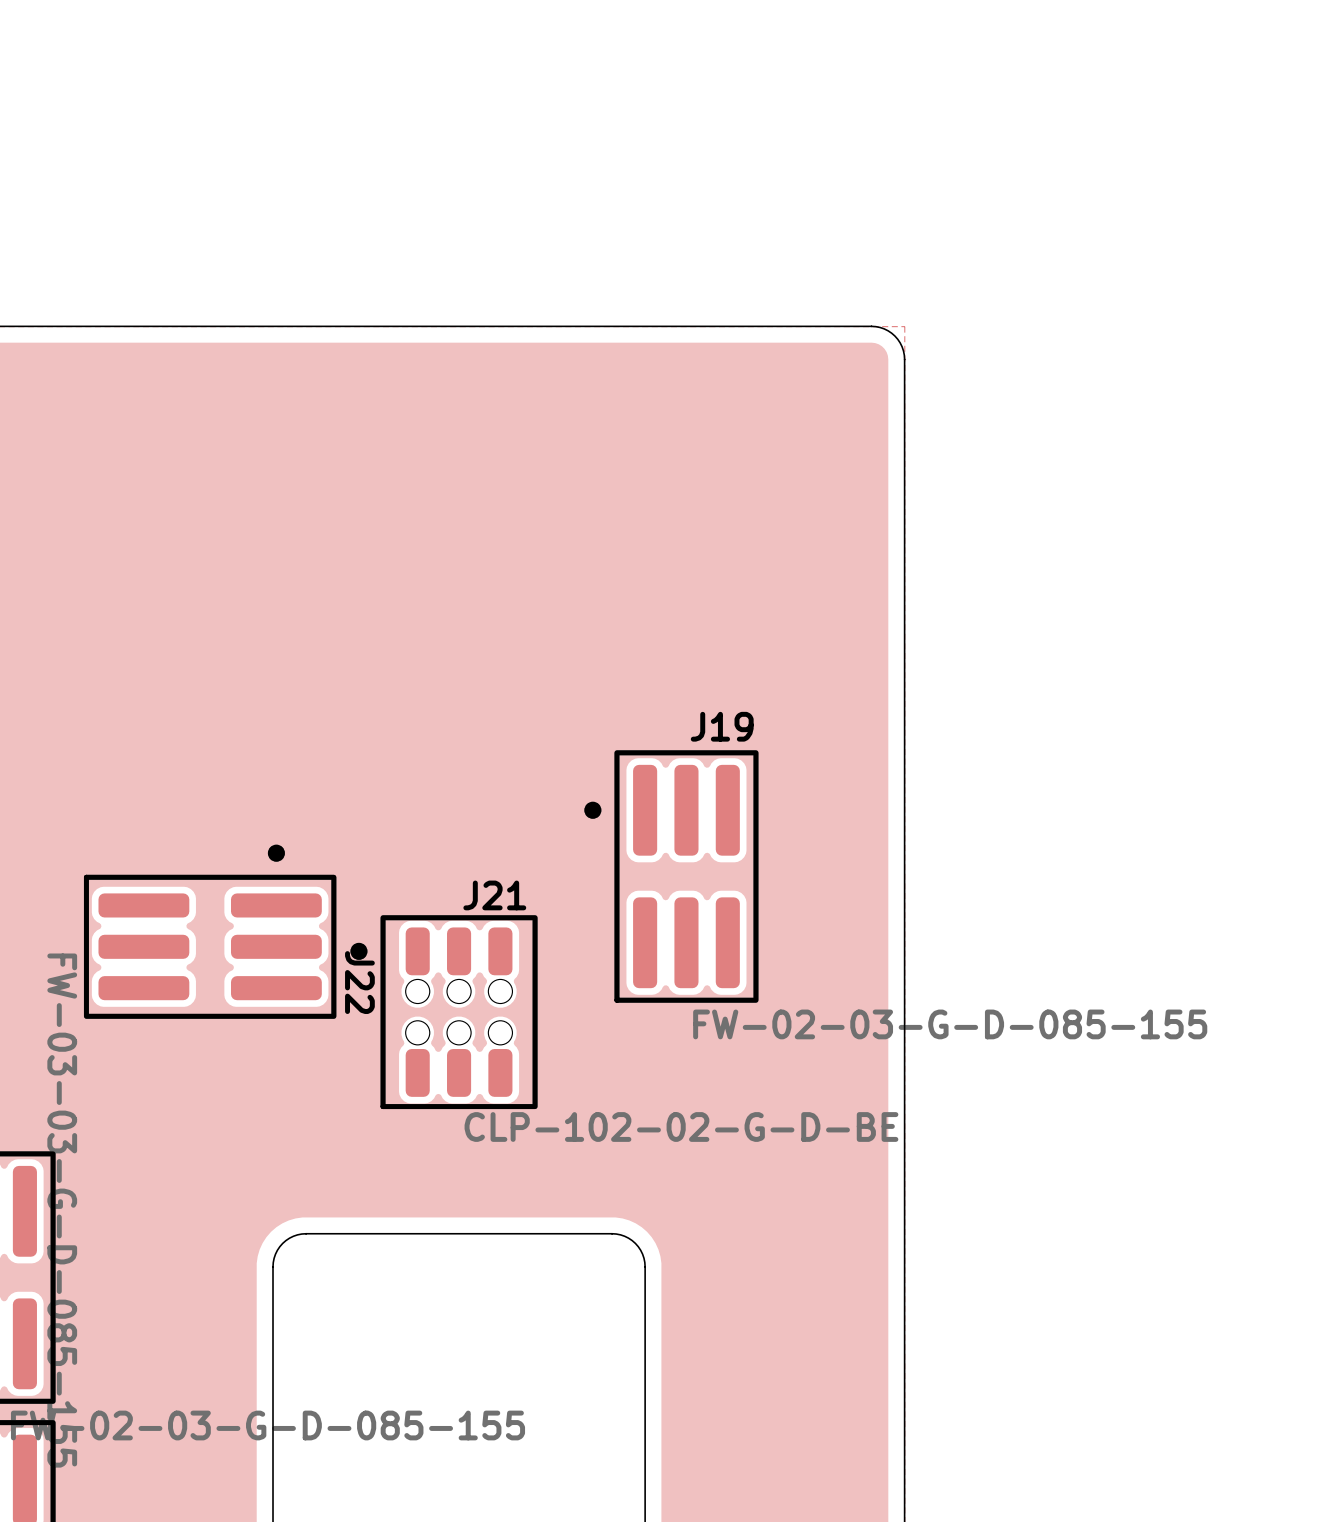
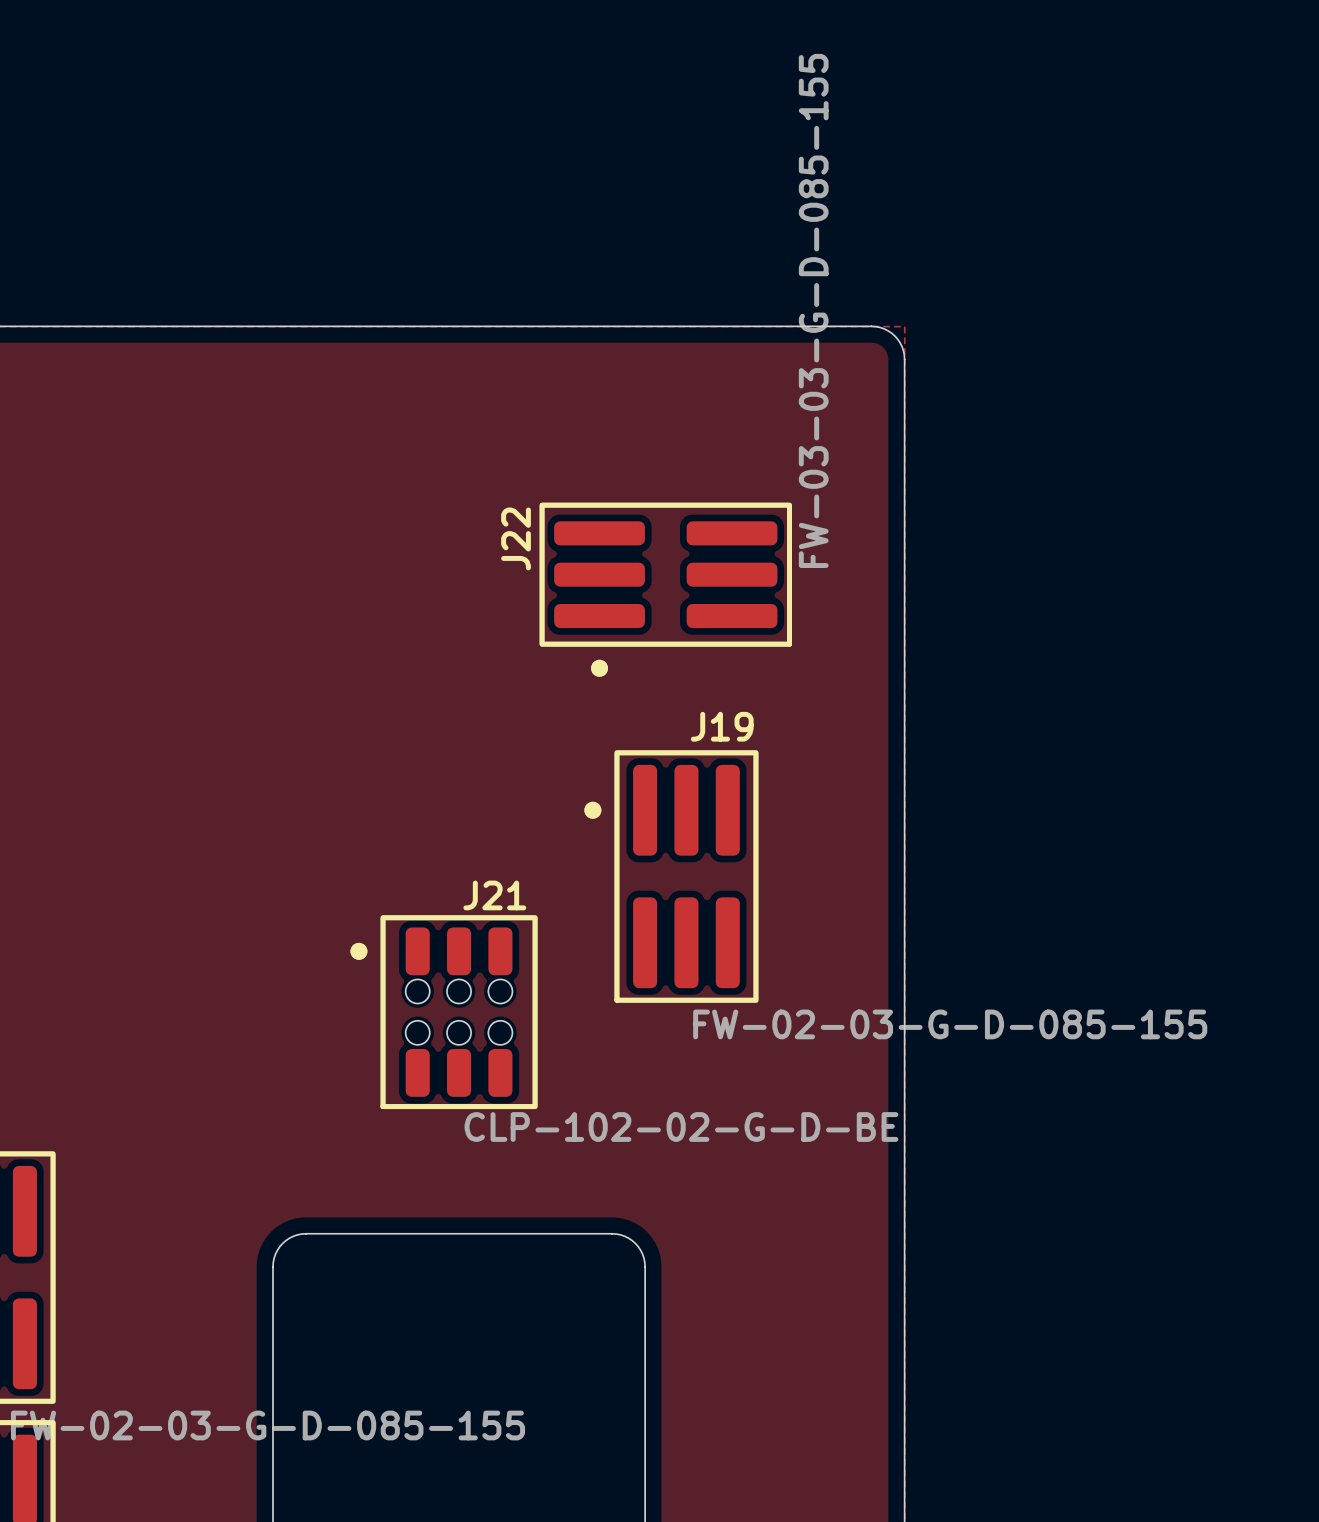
J22 rotation: 0° (210, 931) -> 180° (665, 589)
J22 position: (210, 931) -> (665, 589)

